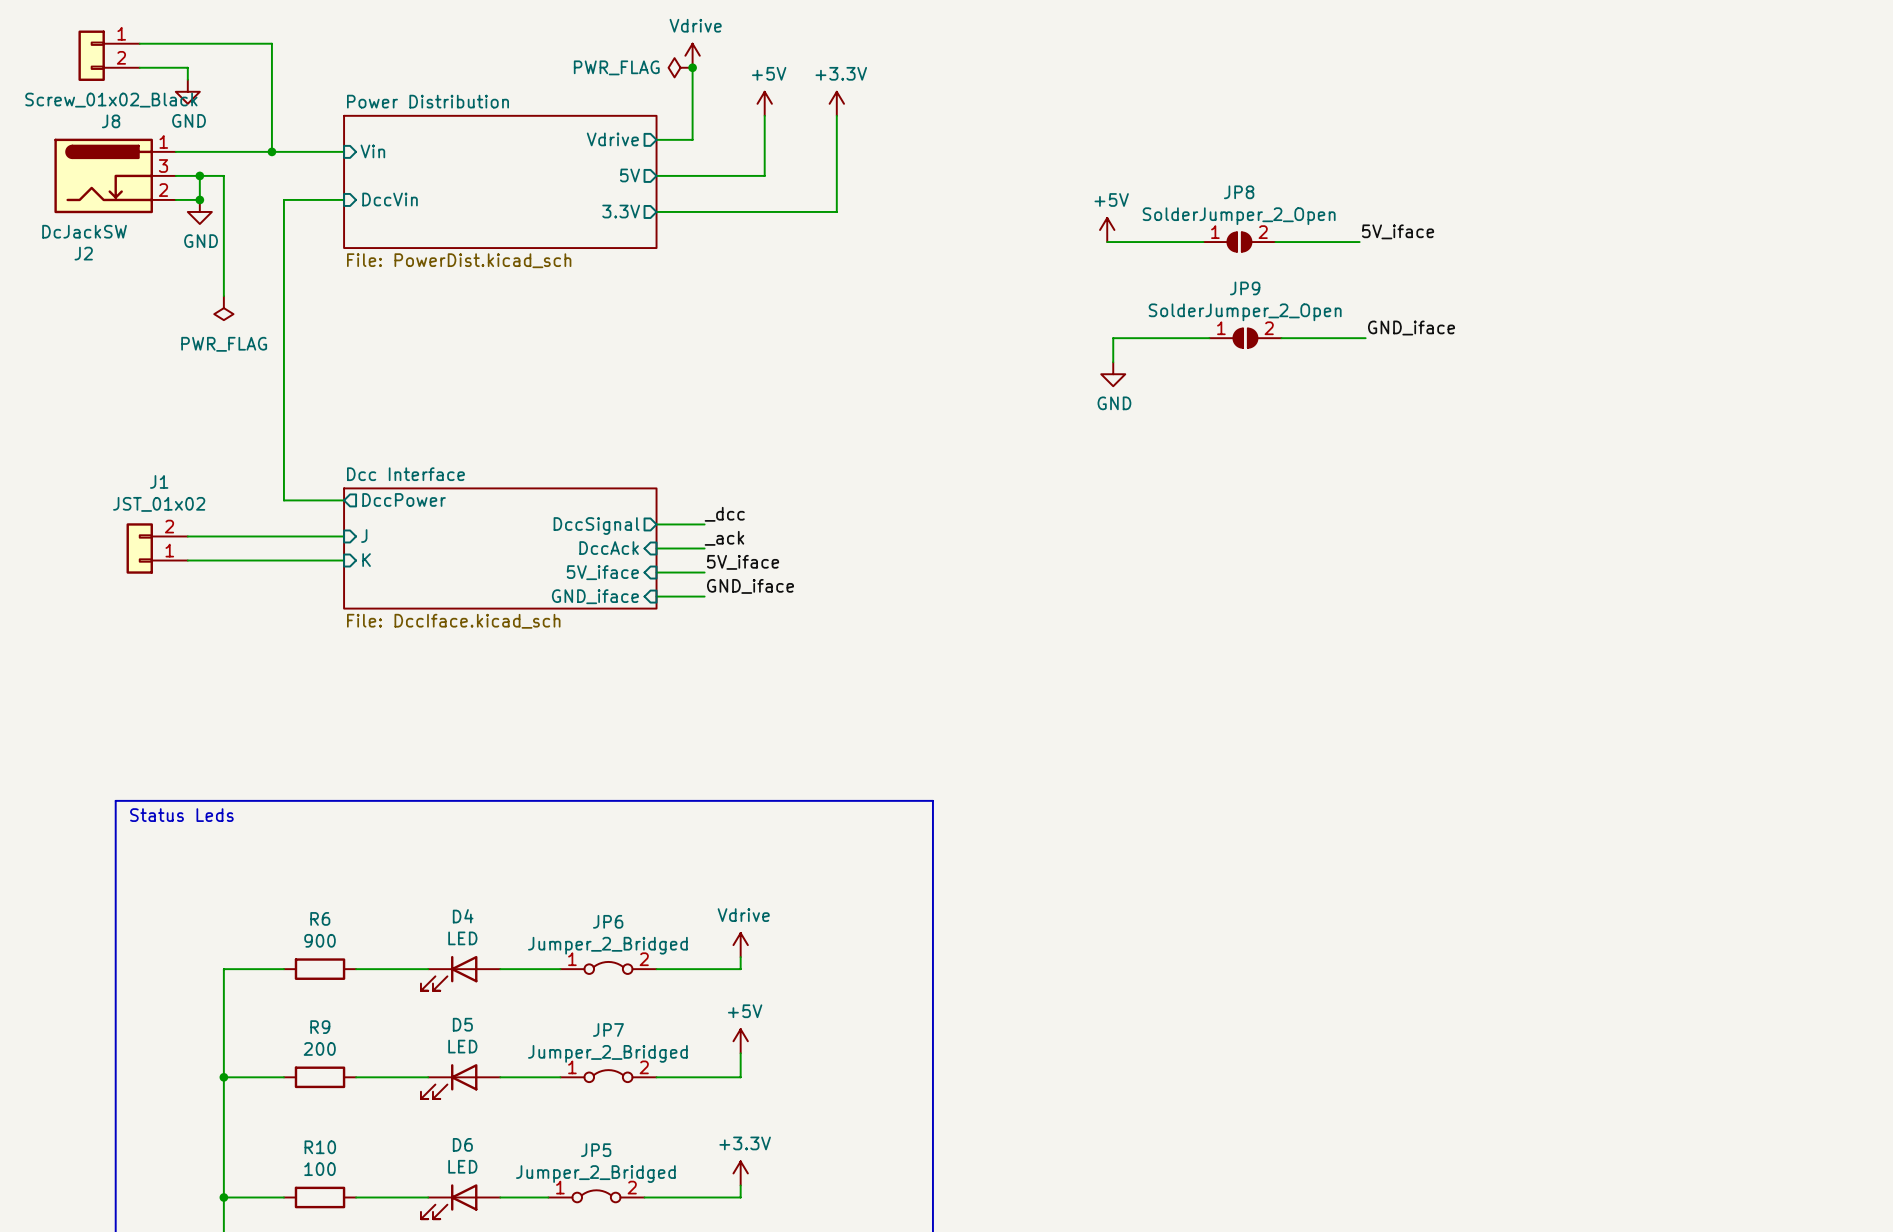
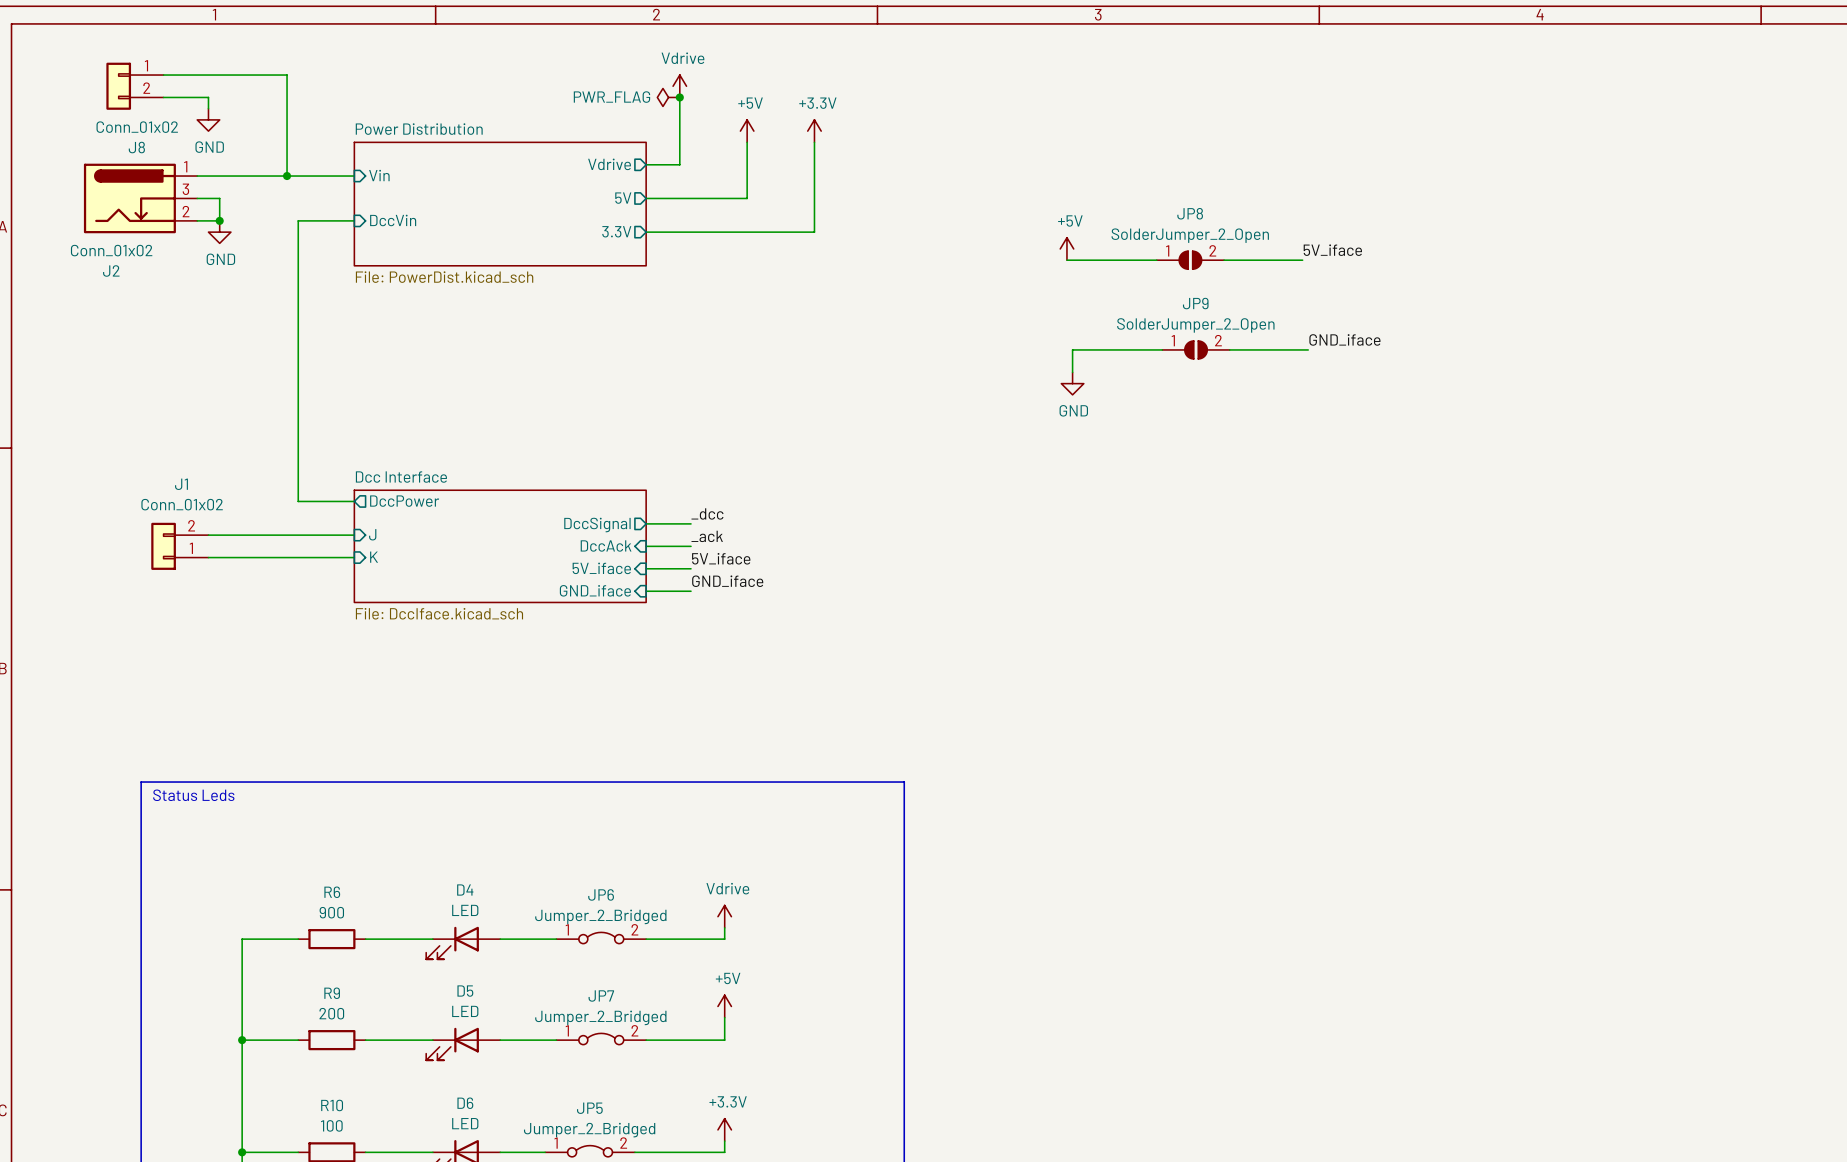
J8 value: Screw_01x02_Black (111, 100) -> Conn_01x02 (137, 127)
wire: (199, 175) (223, 175) (223, 296) -> none
junction: (199, 175) -> none
J2 value: DcJackSW (84, 231) -> Conn_01x02 (111, 250)
power symbol: PWR_FLAG (223, 308) -> none
J1 value: JST_01x02 (159, 504) -> Conn_01x02 (182, 504)

